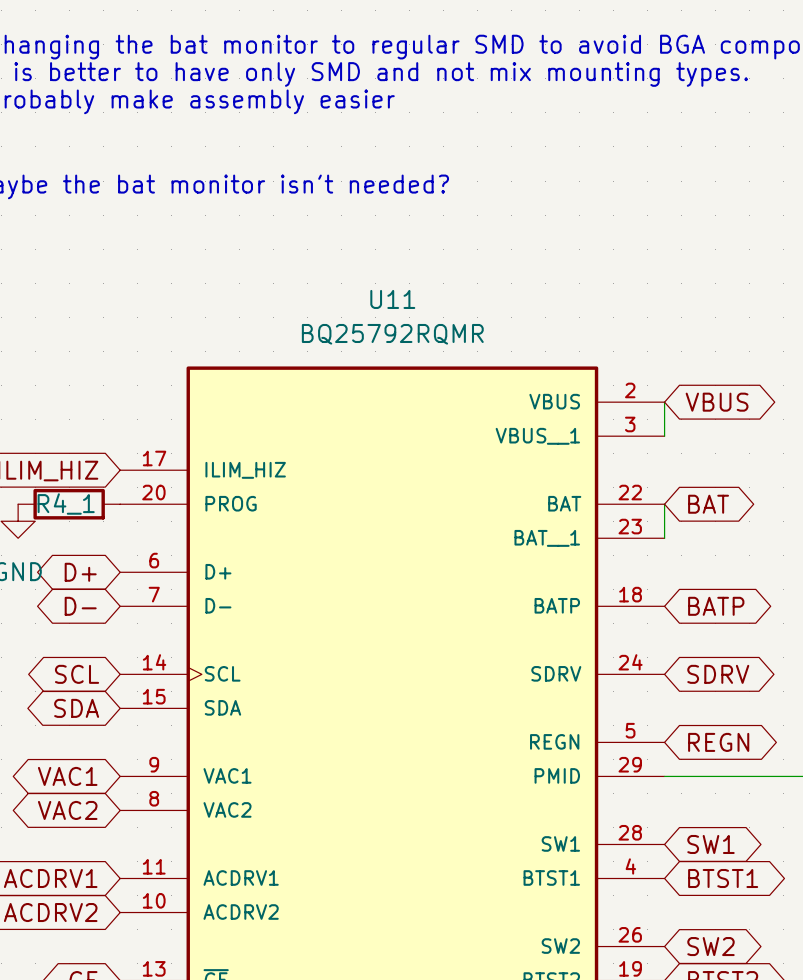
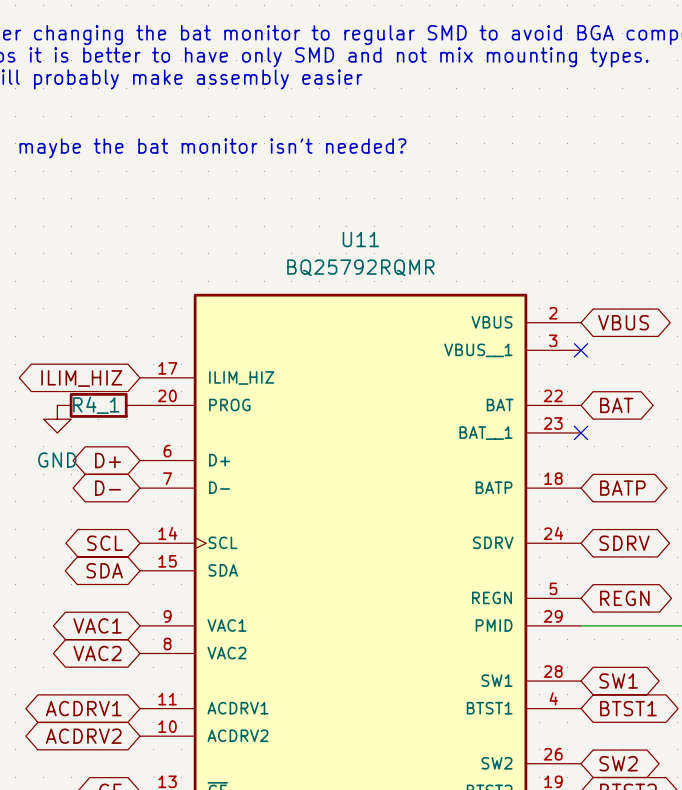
wire: (664, 402) (664, 436) -> none
no-connect mark: none -> (581, 350)
wire: (664, 504) (664, 538) -> none
no-connect mark: none -> (581, 432)

